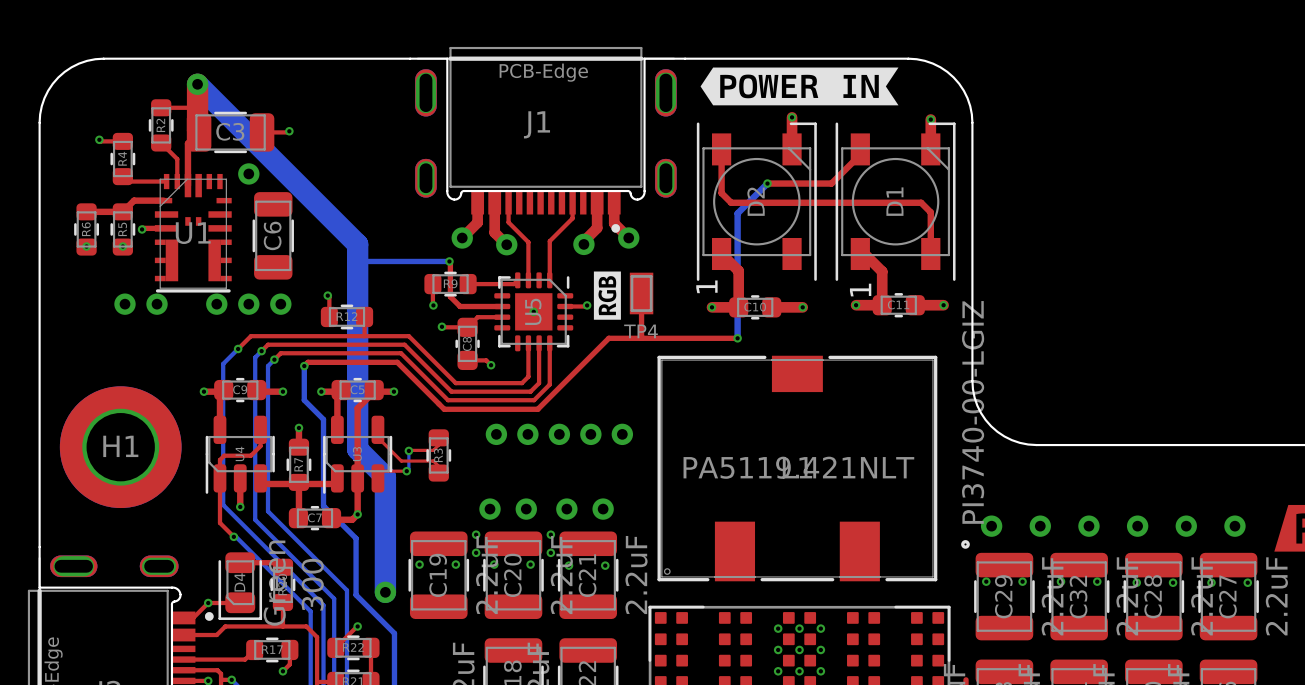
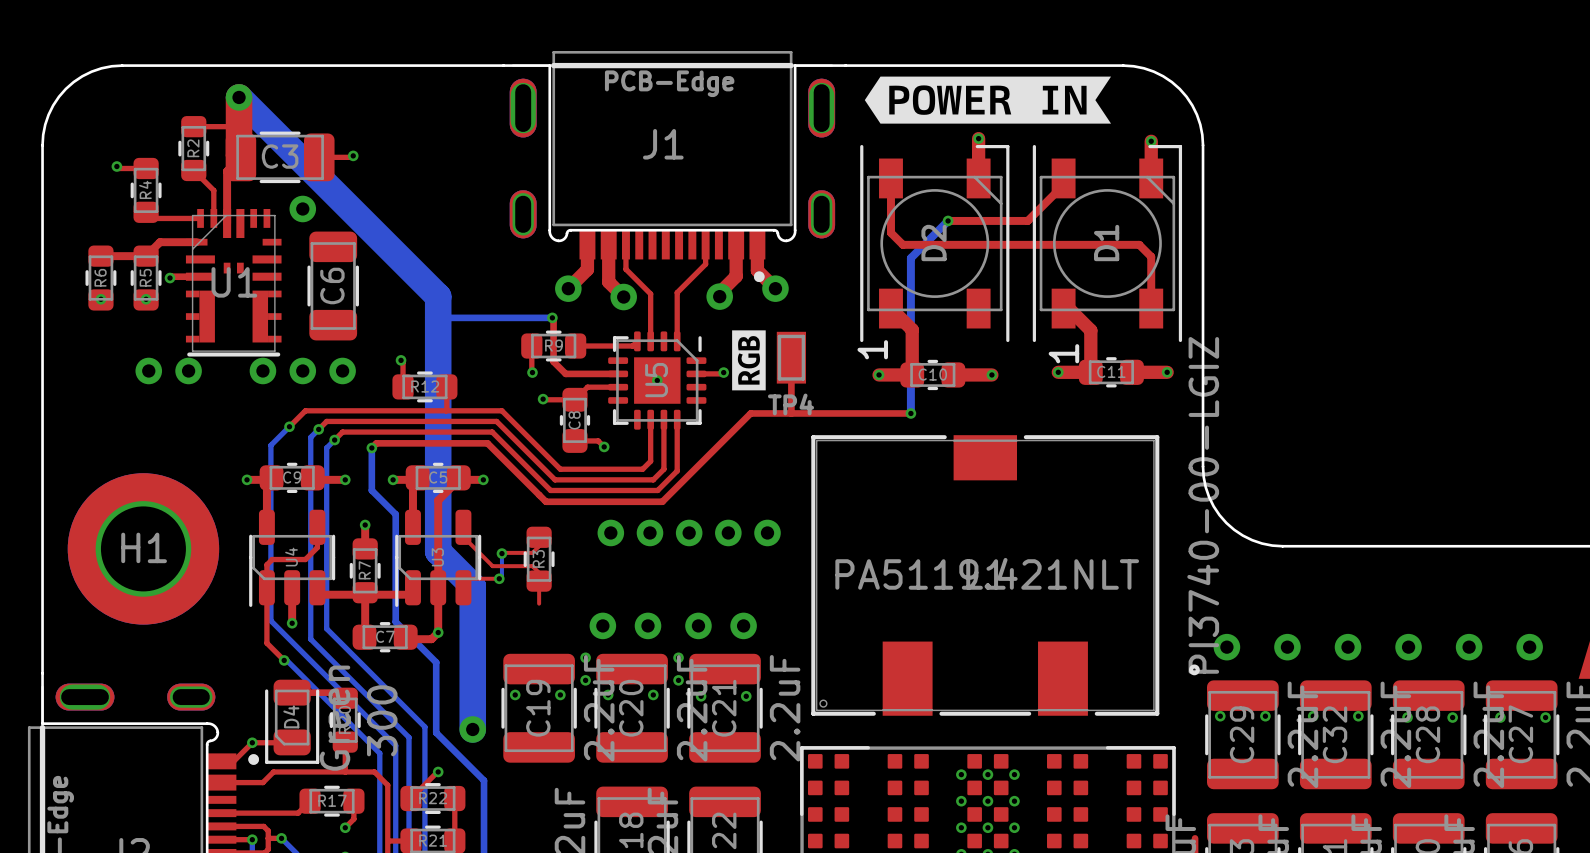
top track: none -> (539, 581) (539, 603)

